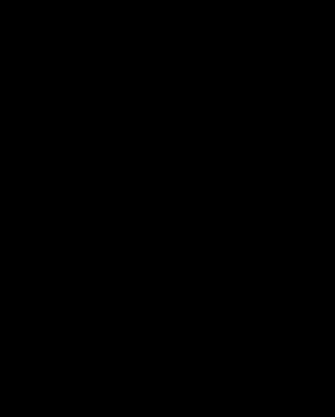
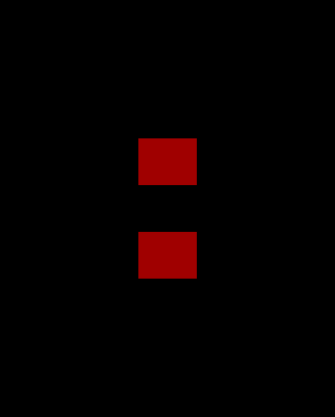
part: none -> (167, 208)

